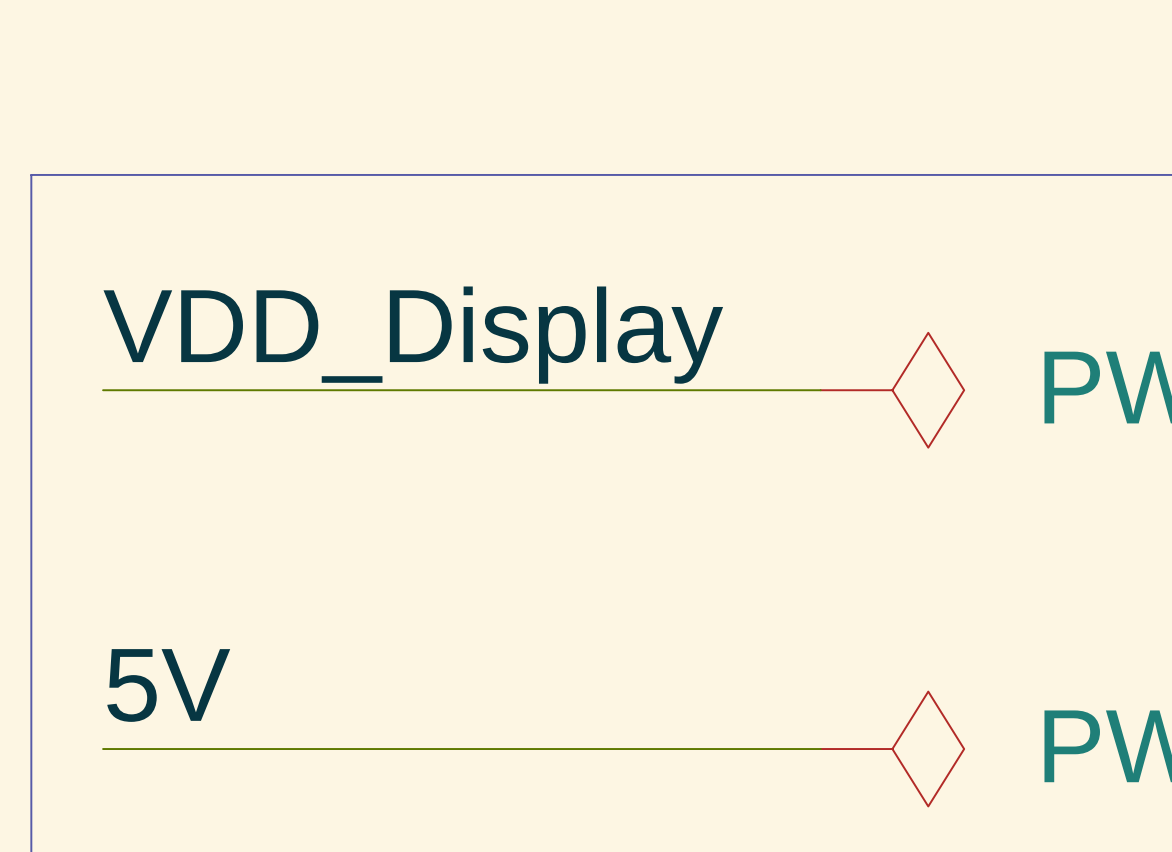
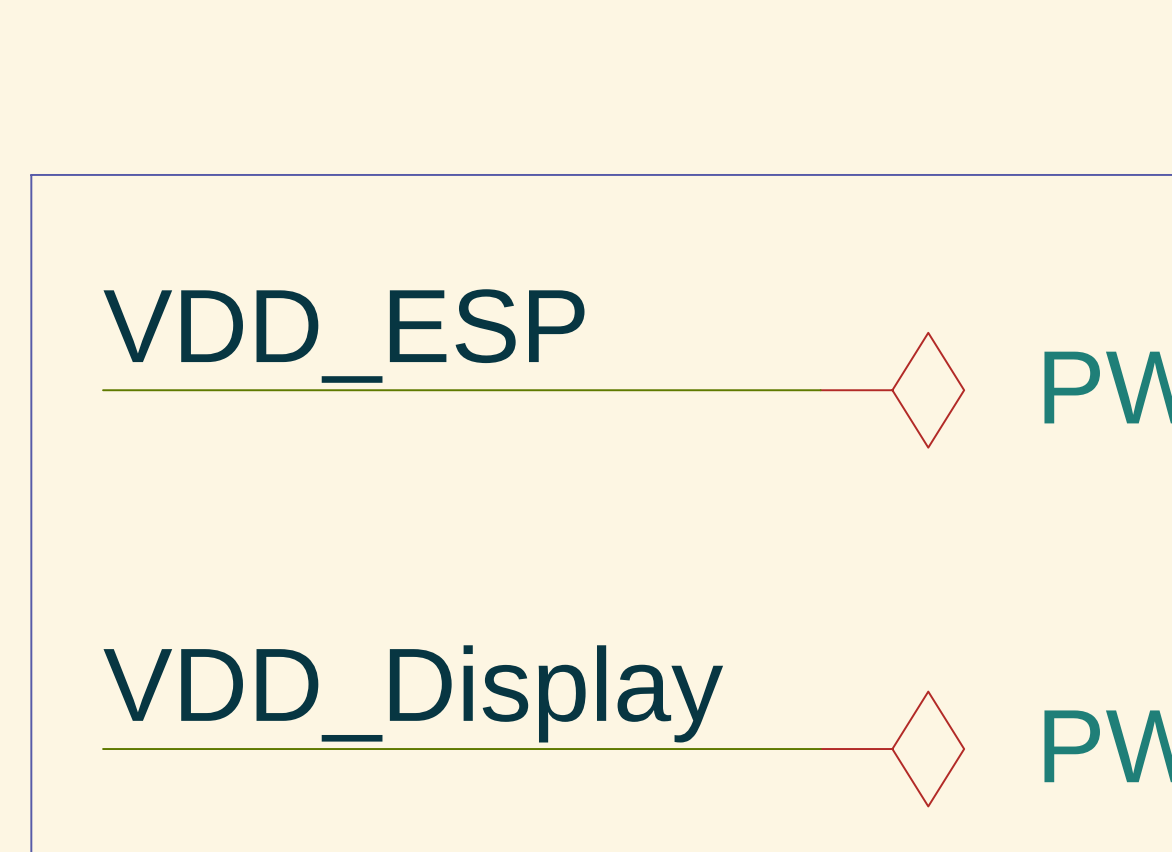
label: VDD_Display (413, 335) -> VDD_ESP (344, 336)
label: 5V (168, 685) -> VDD_Display (413, 693)

